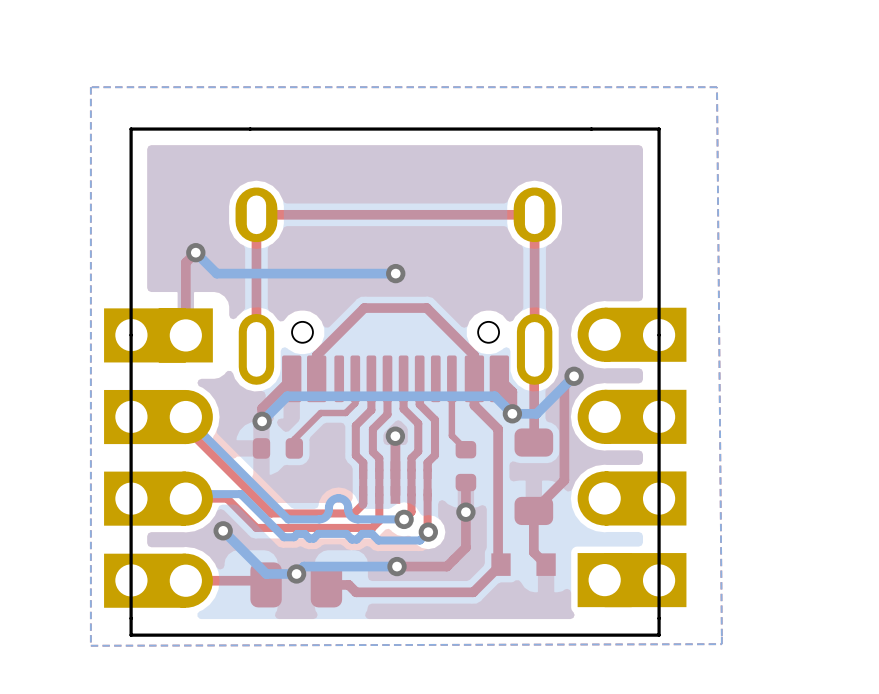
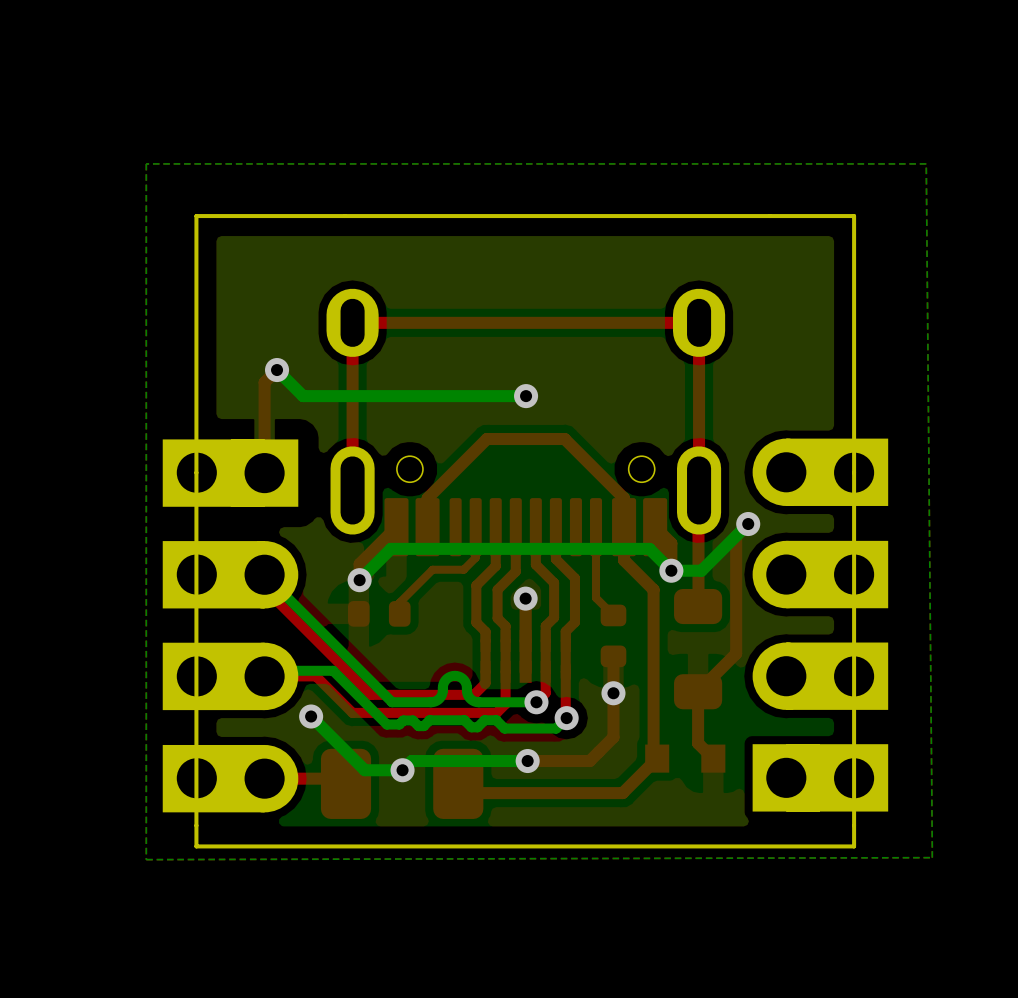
part footprint: [250, 562, 343, 608] -> [320, 748, 484, 819]

